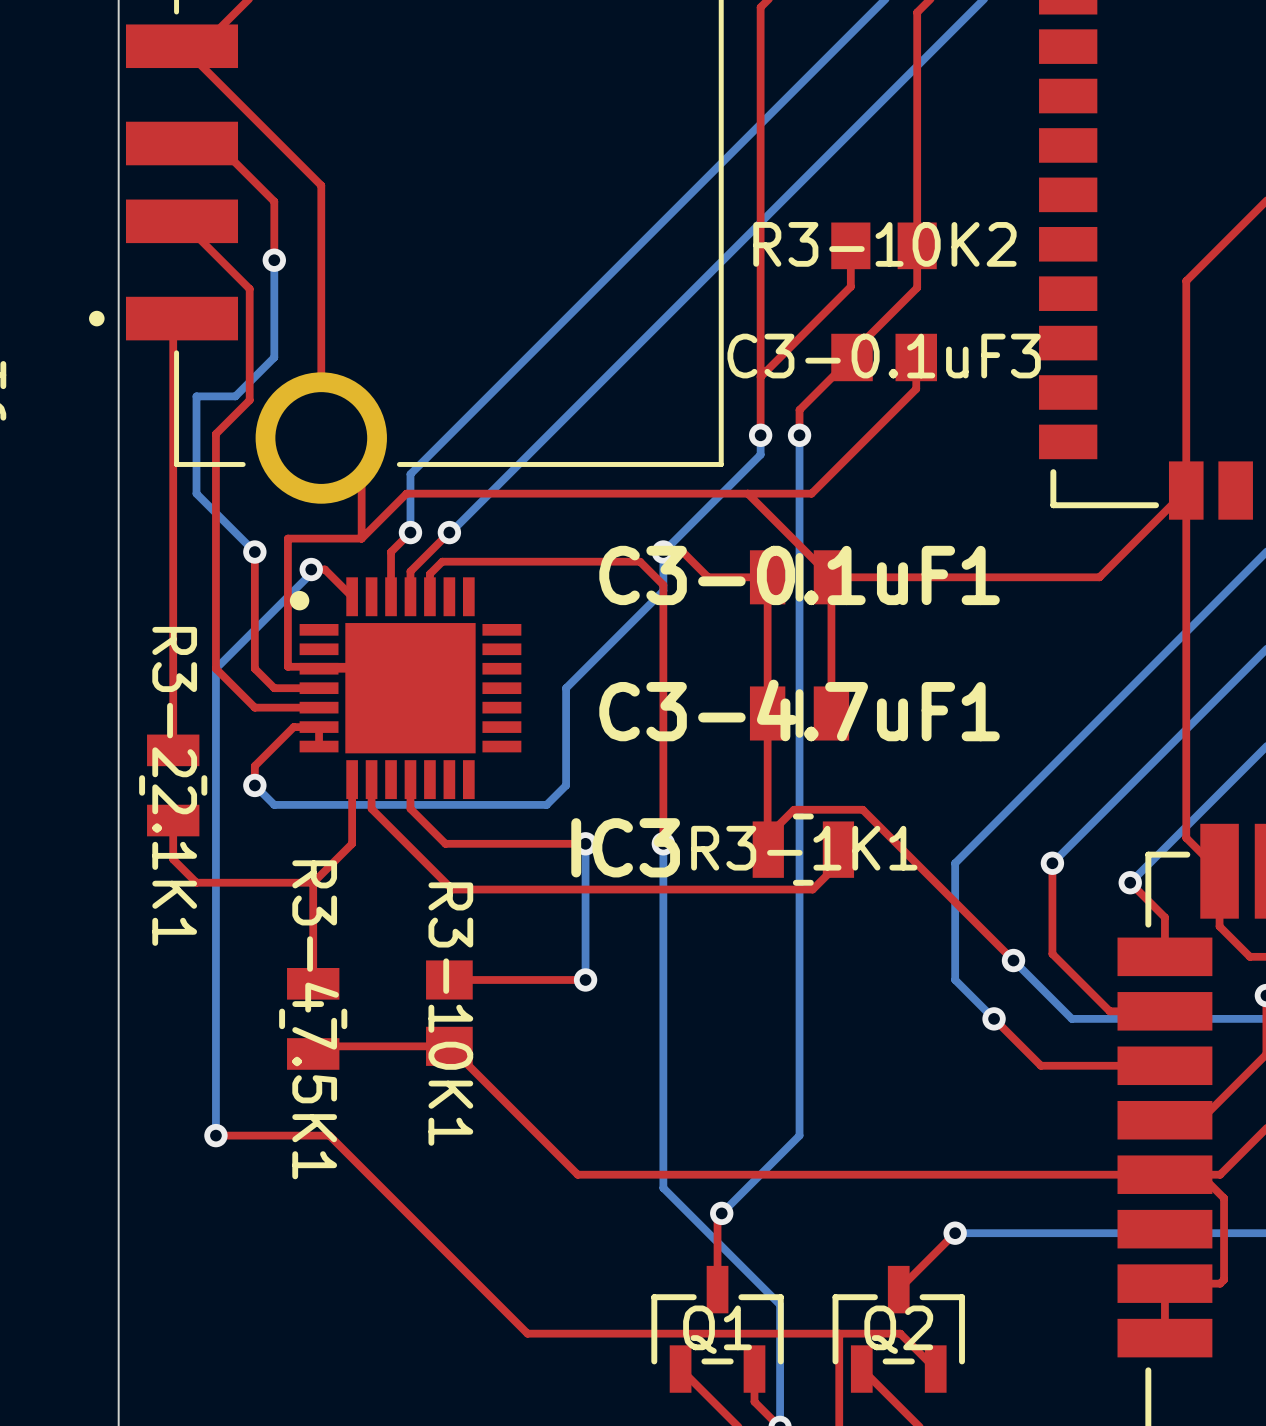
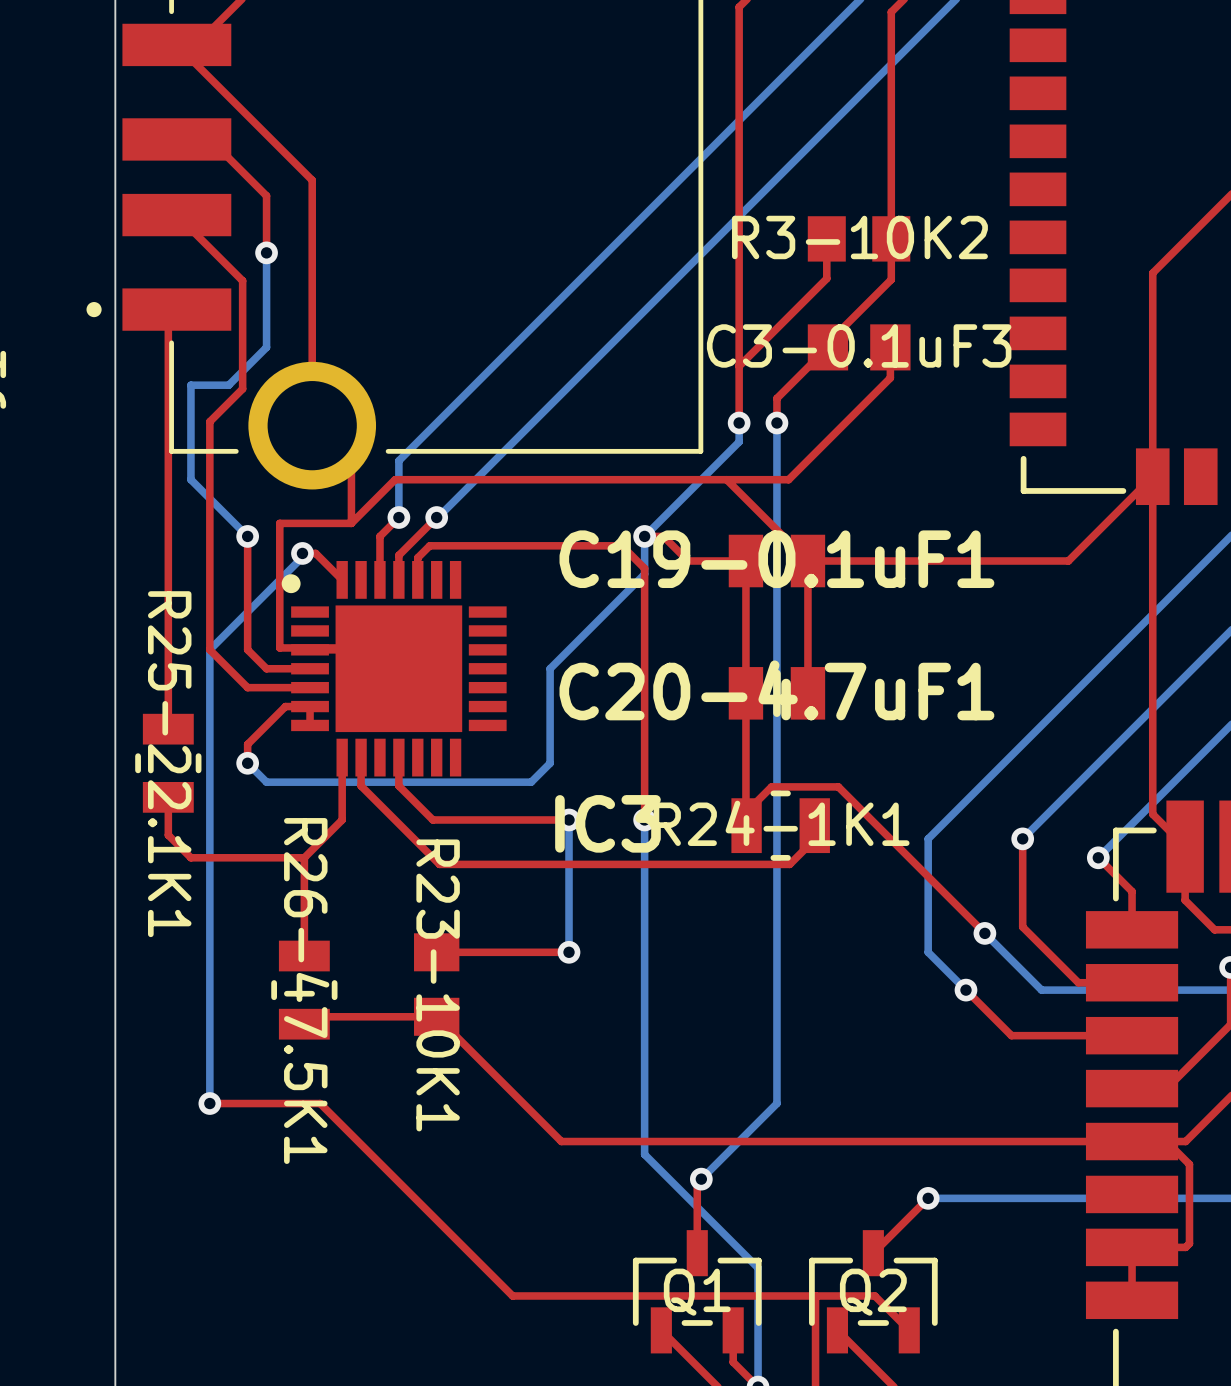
C3-0.1uF1 name: C3-0.1uF1 (799, 575) -> C19-0.1uF1 (776, 559)
C3-4.7uF1 name: C3-4.7uF1 (799, 710) -> C20-4.7uF1 (776, 690)
R3-22.1K1 name: R3-22.1K1 (174, 786) -> R25-22.1K1 (169, 764)
R3-1K1 name: R3-1K1 (804, 848) -> R24-1K1 (781, 823)
R3-10K1 name: R3-10K1 (450, 1014) -> R23-10K1 (438, 985)
R3-47.5K1 name: R3-47.5K1 (315, 1019) -> R26-47.5K1 (306, 991)

